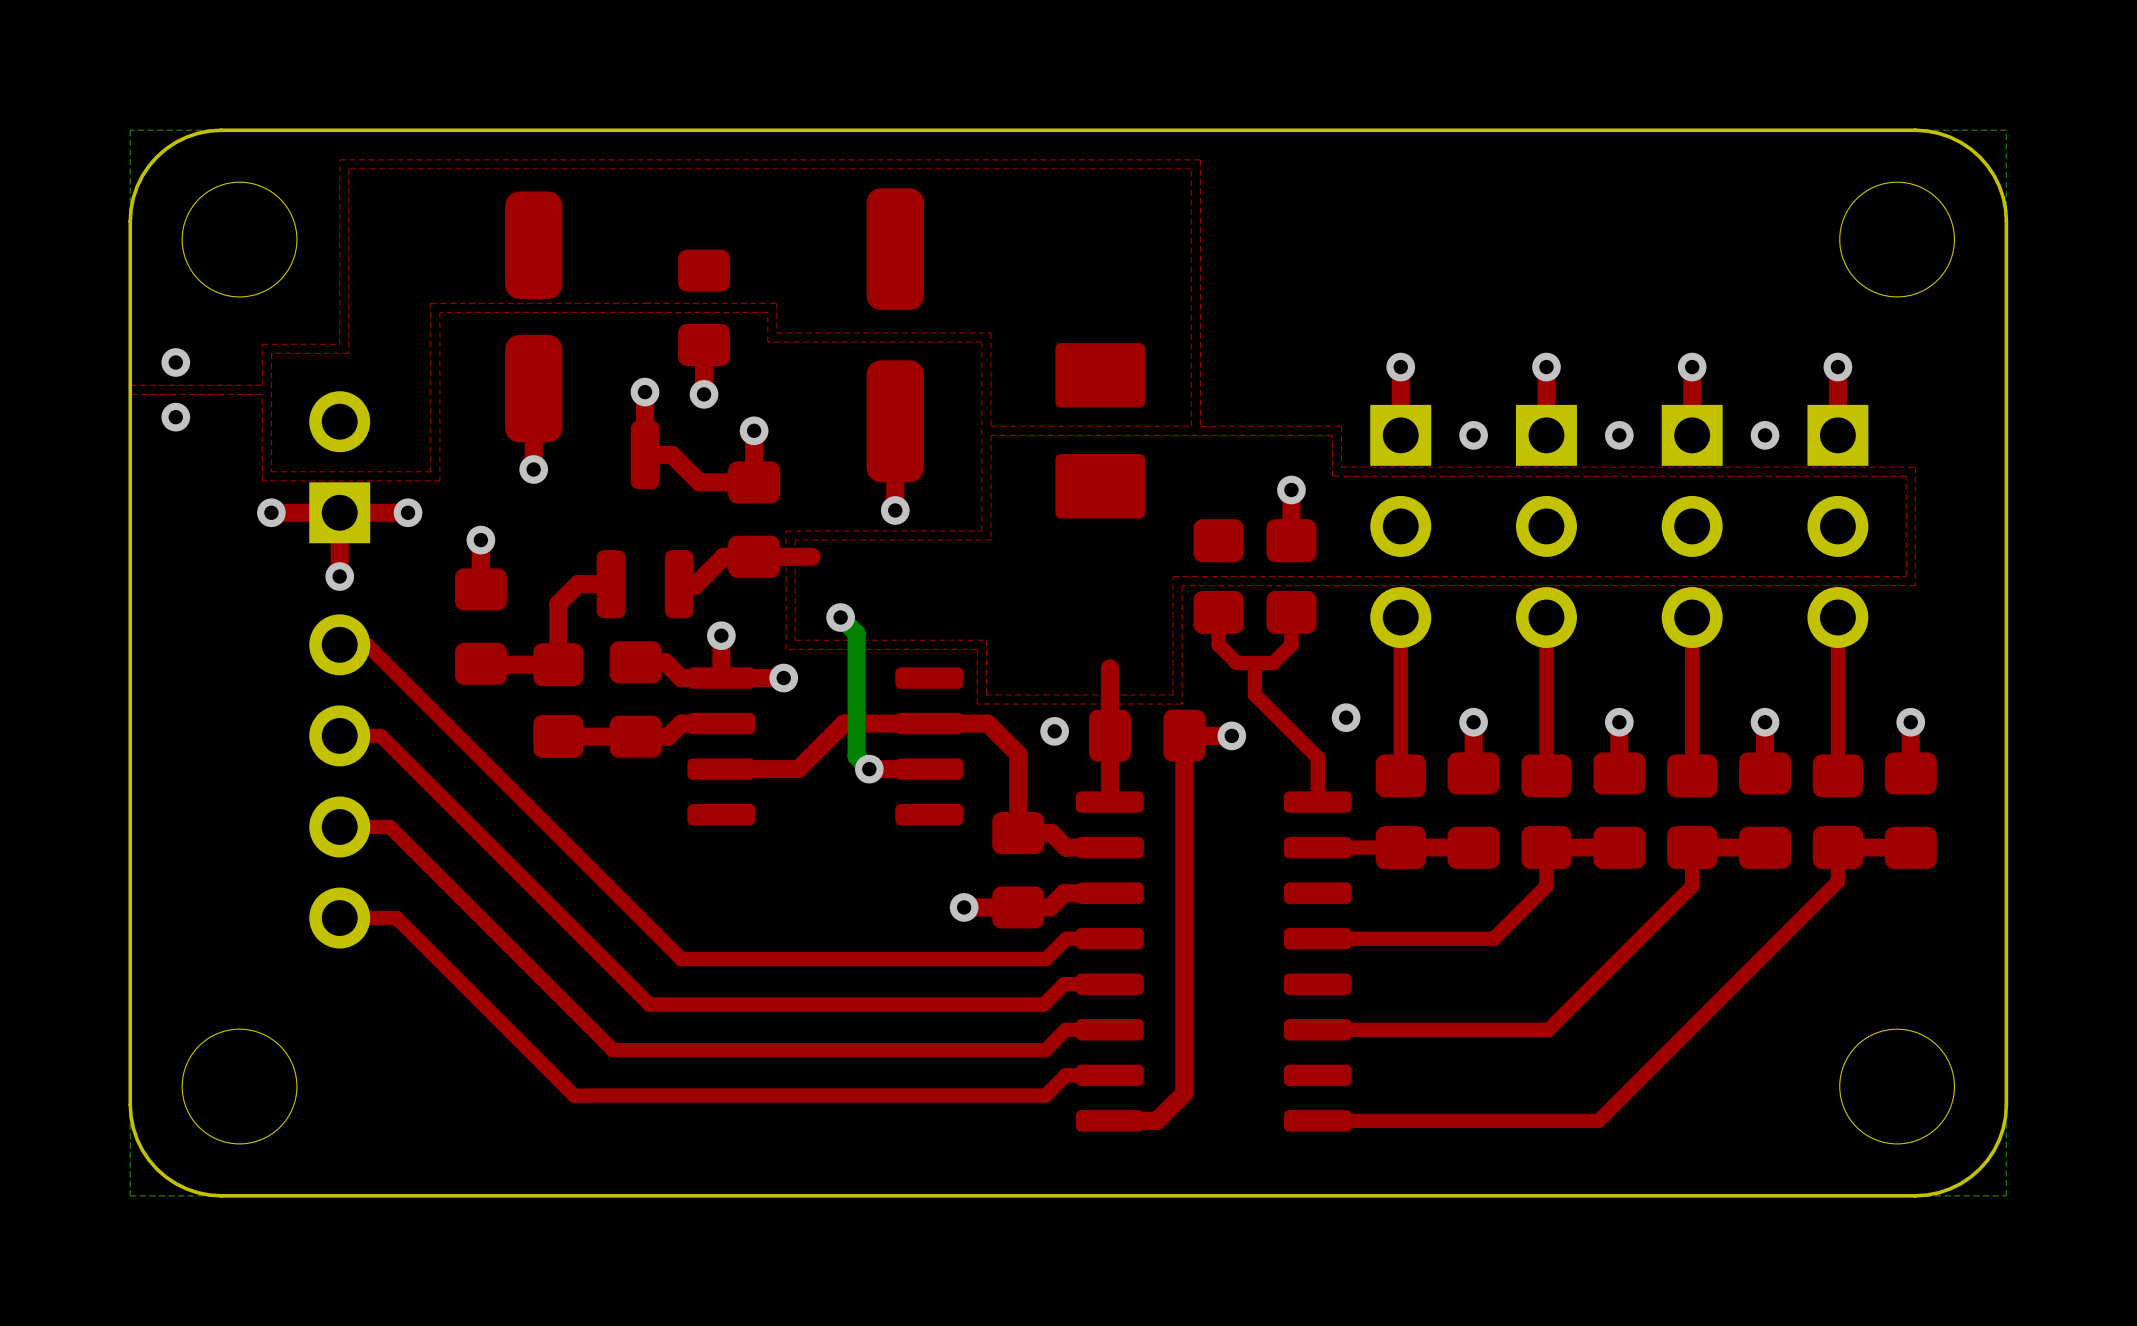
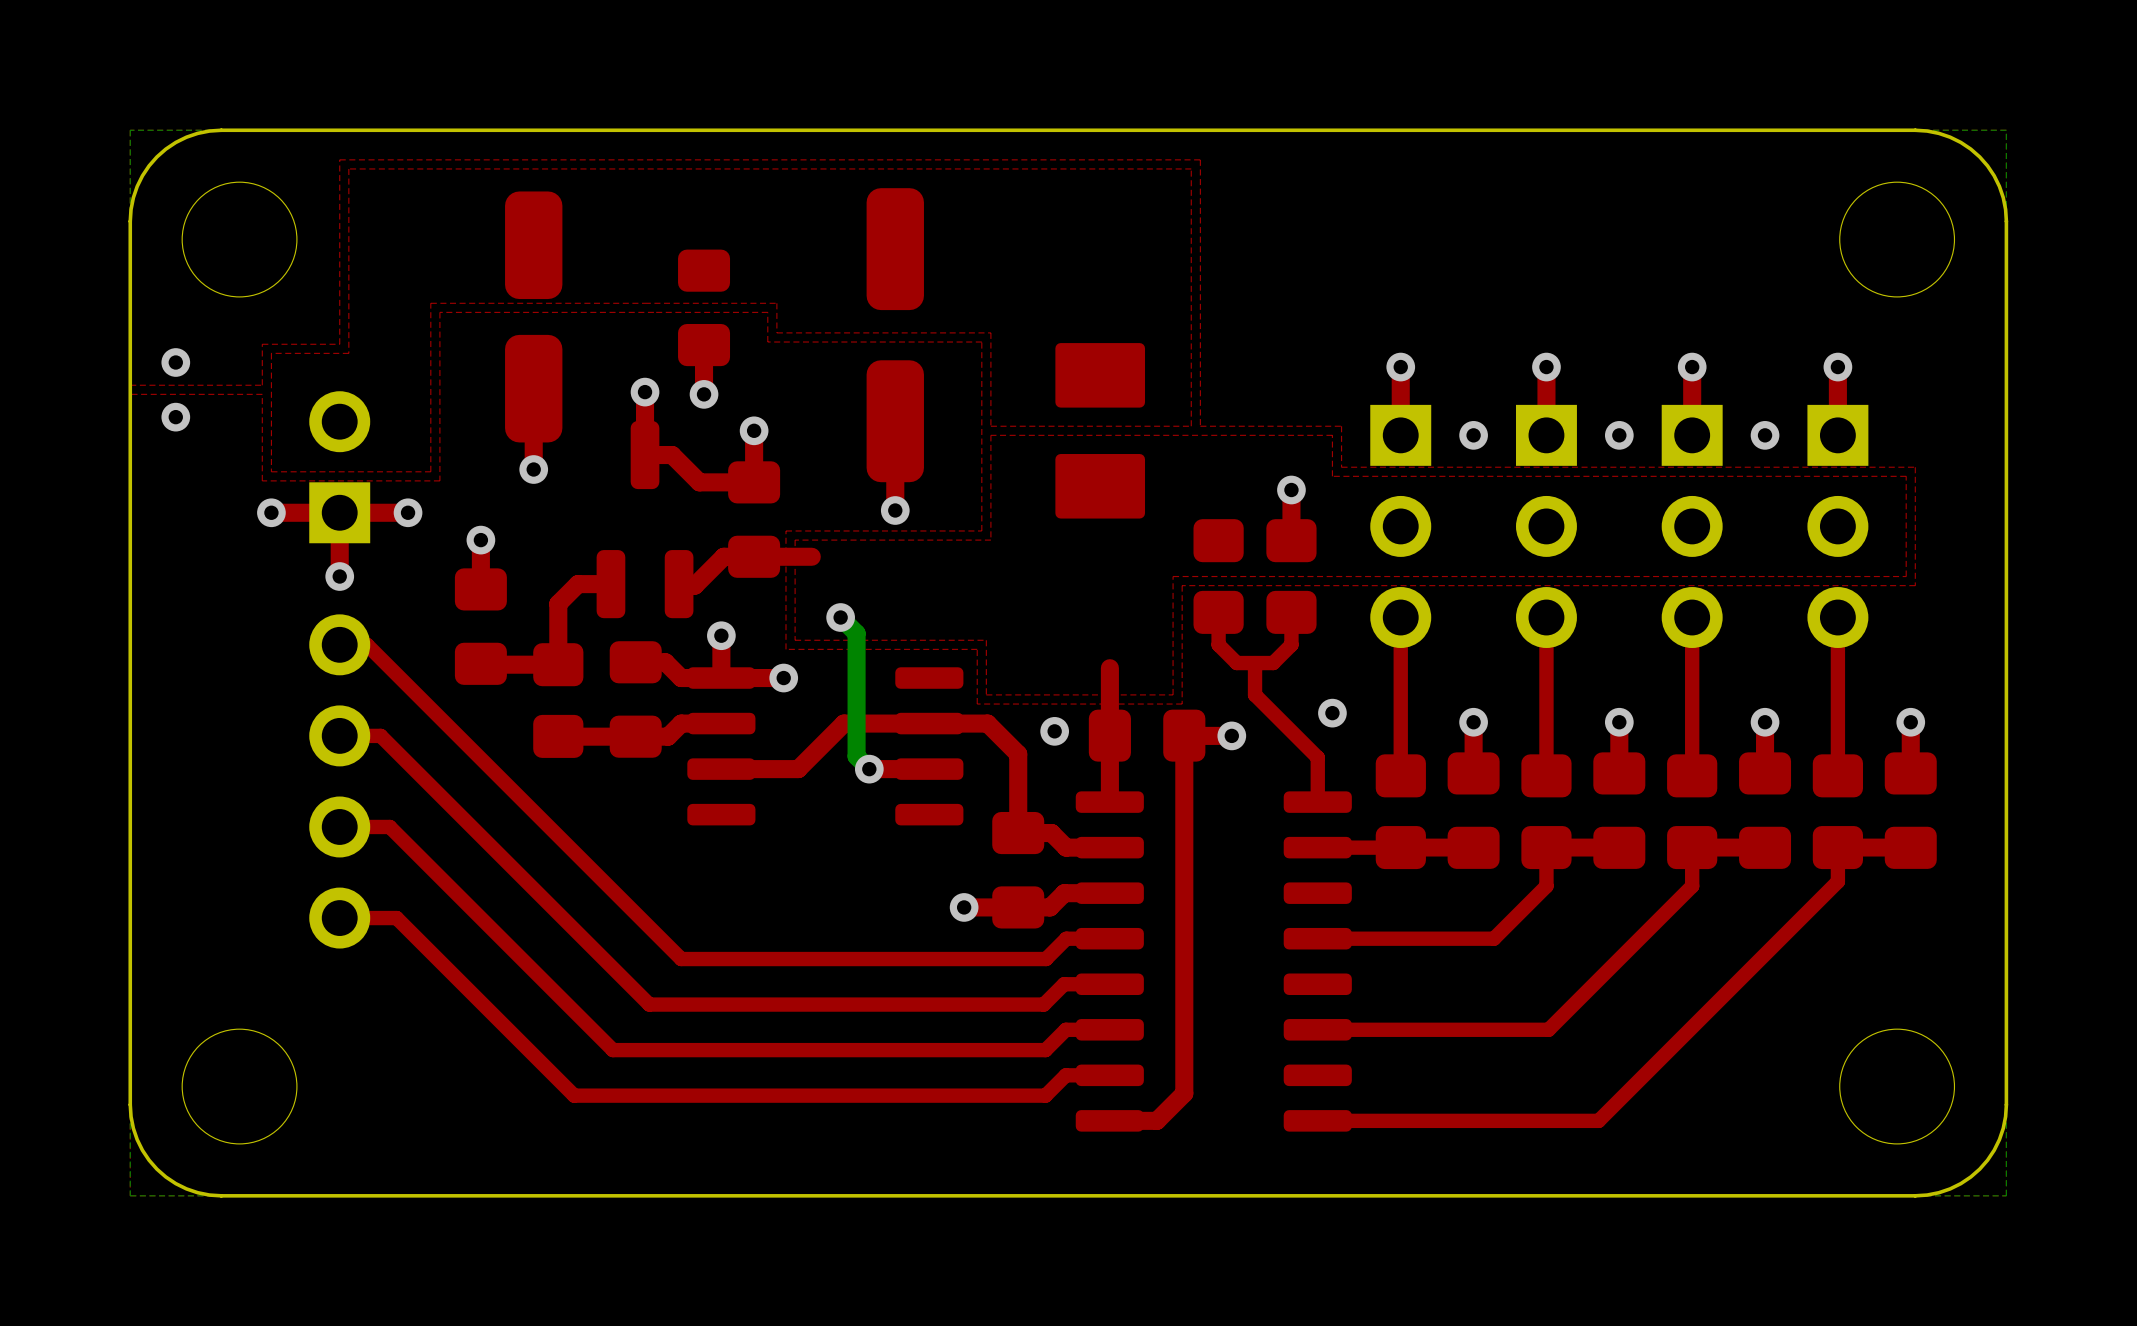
via position: (1346, 717) -> (1332, 713)

